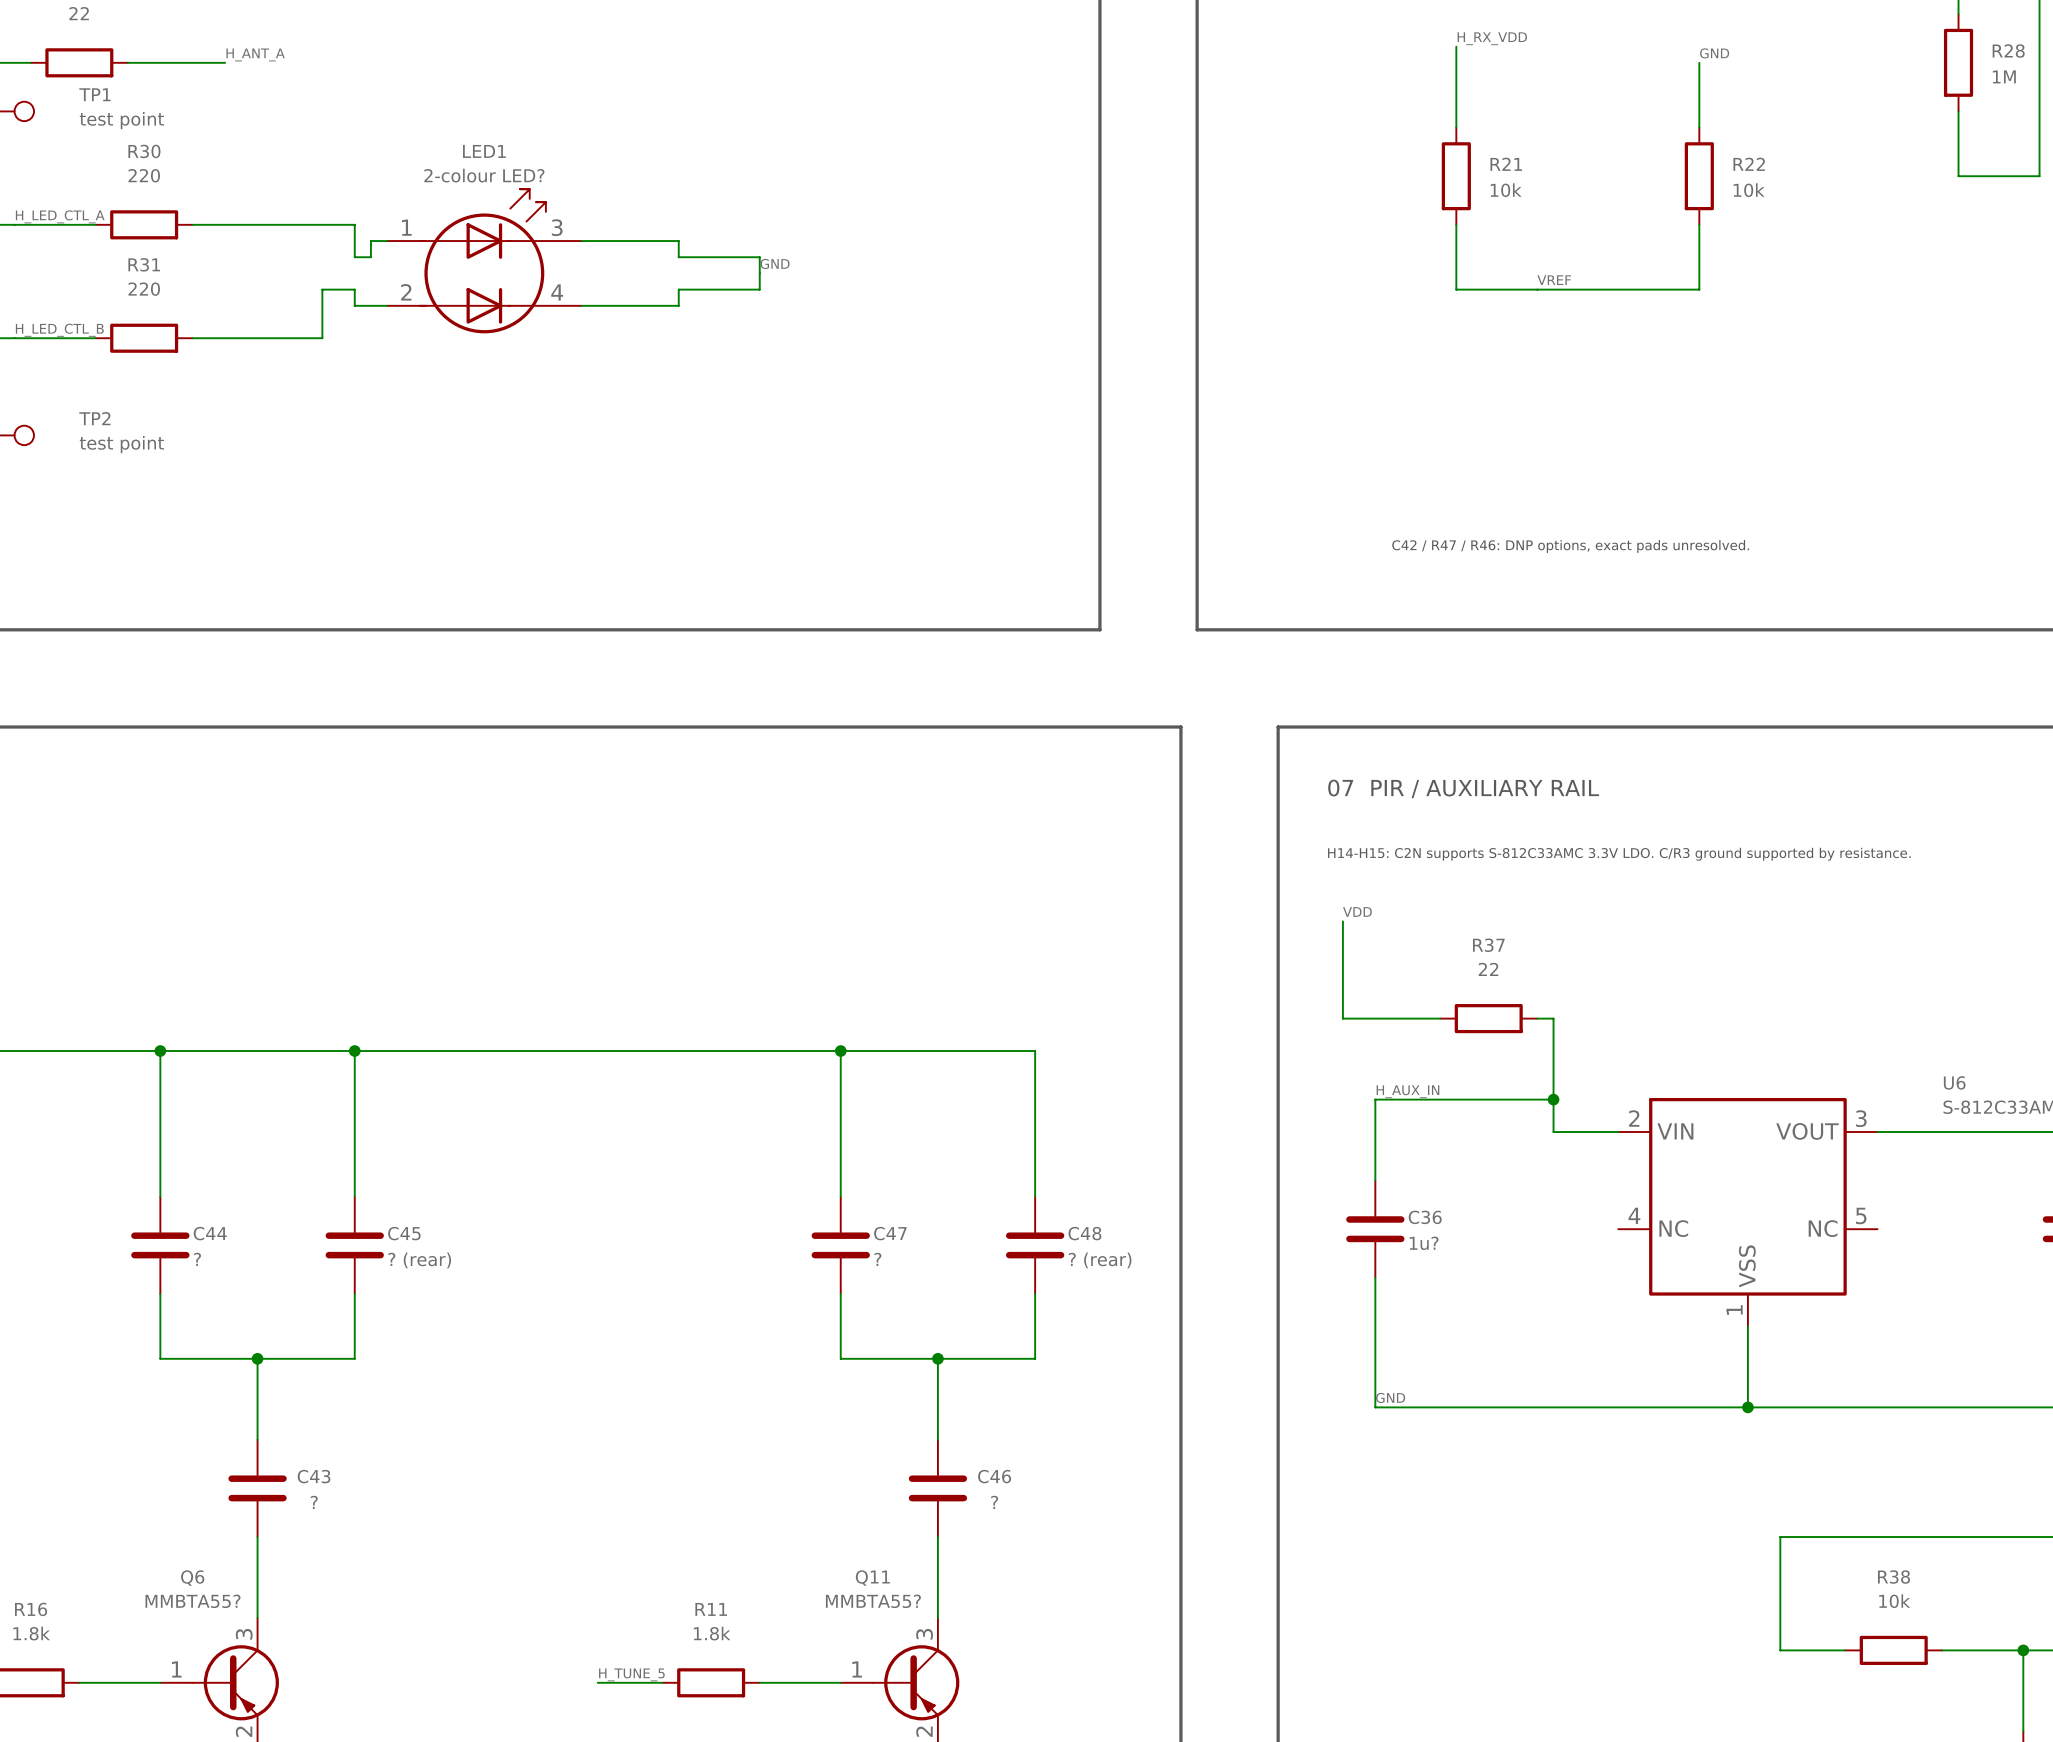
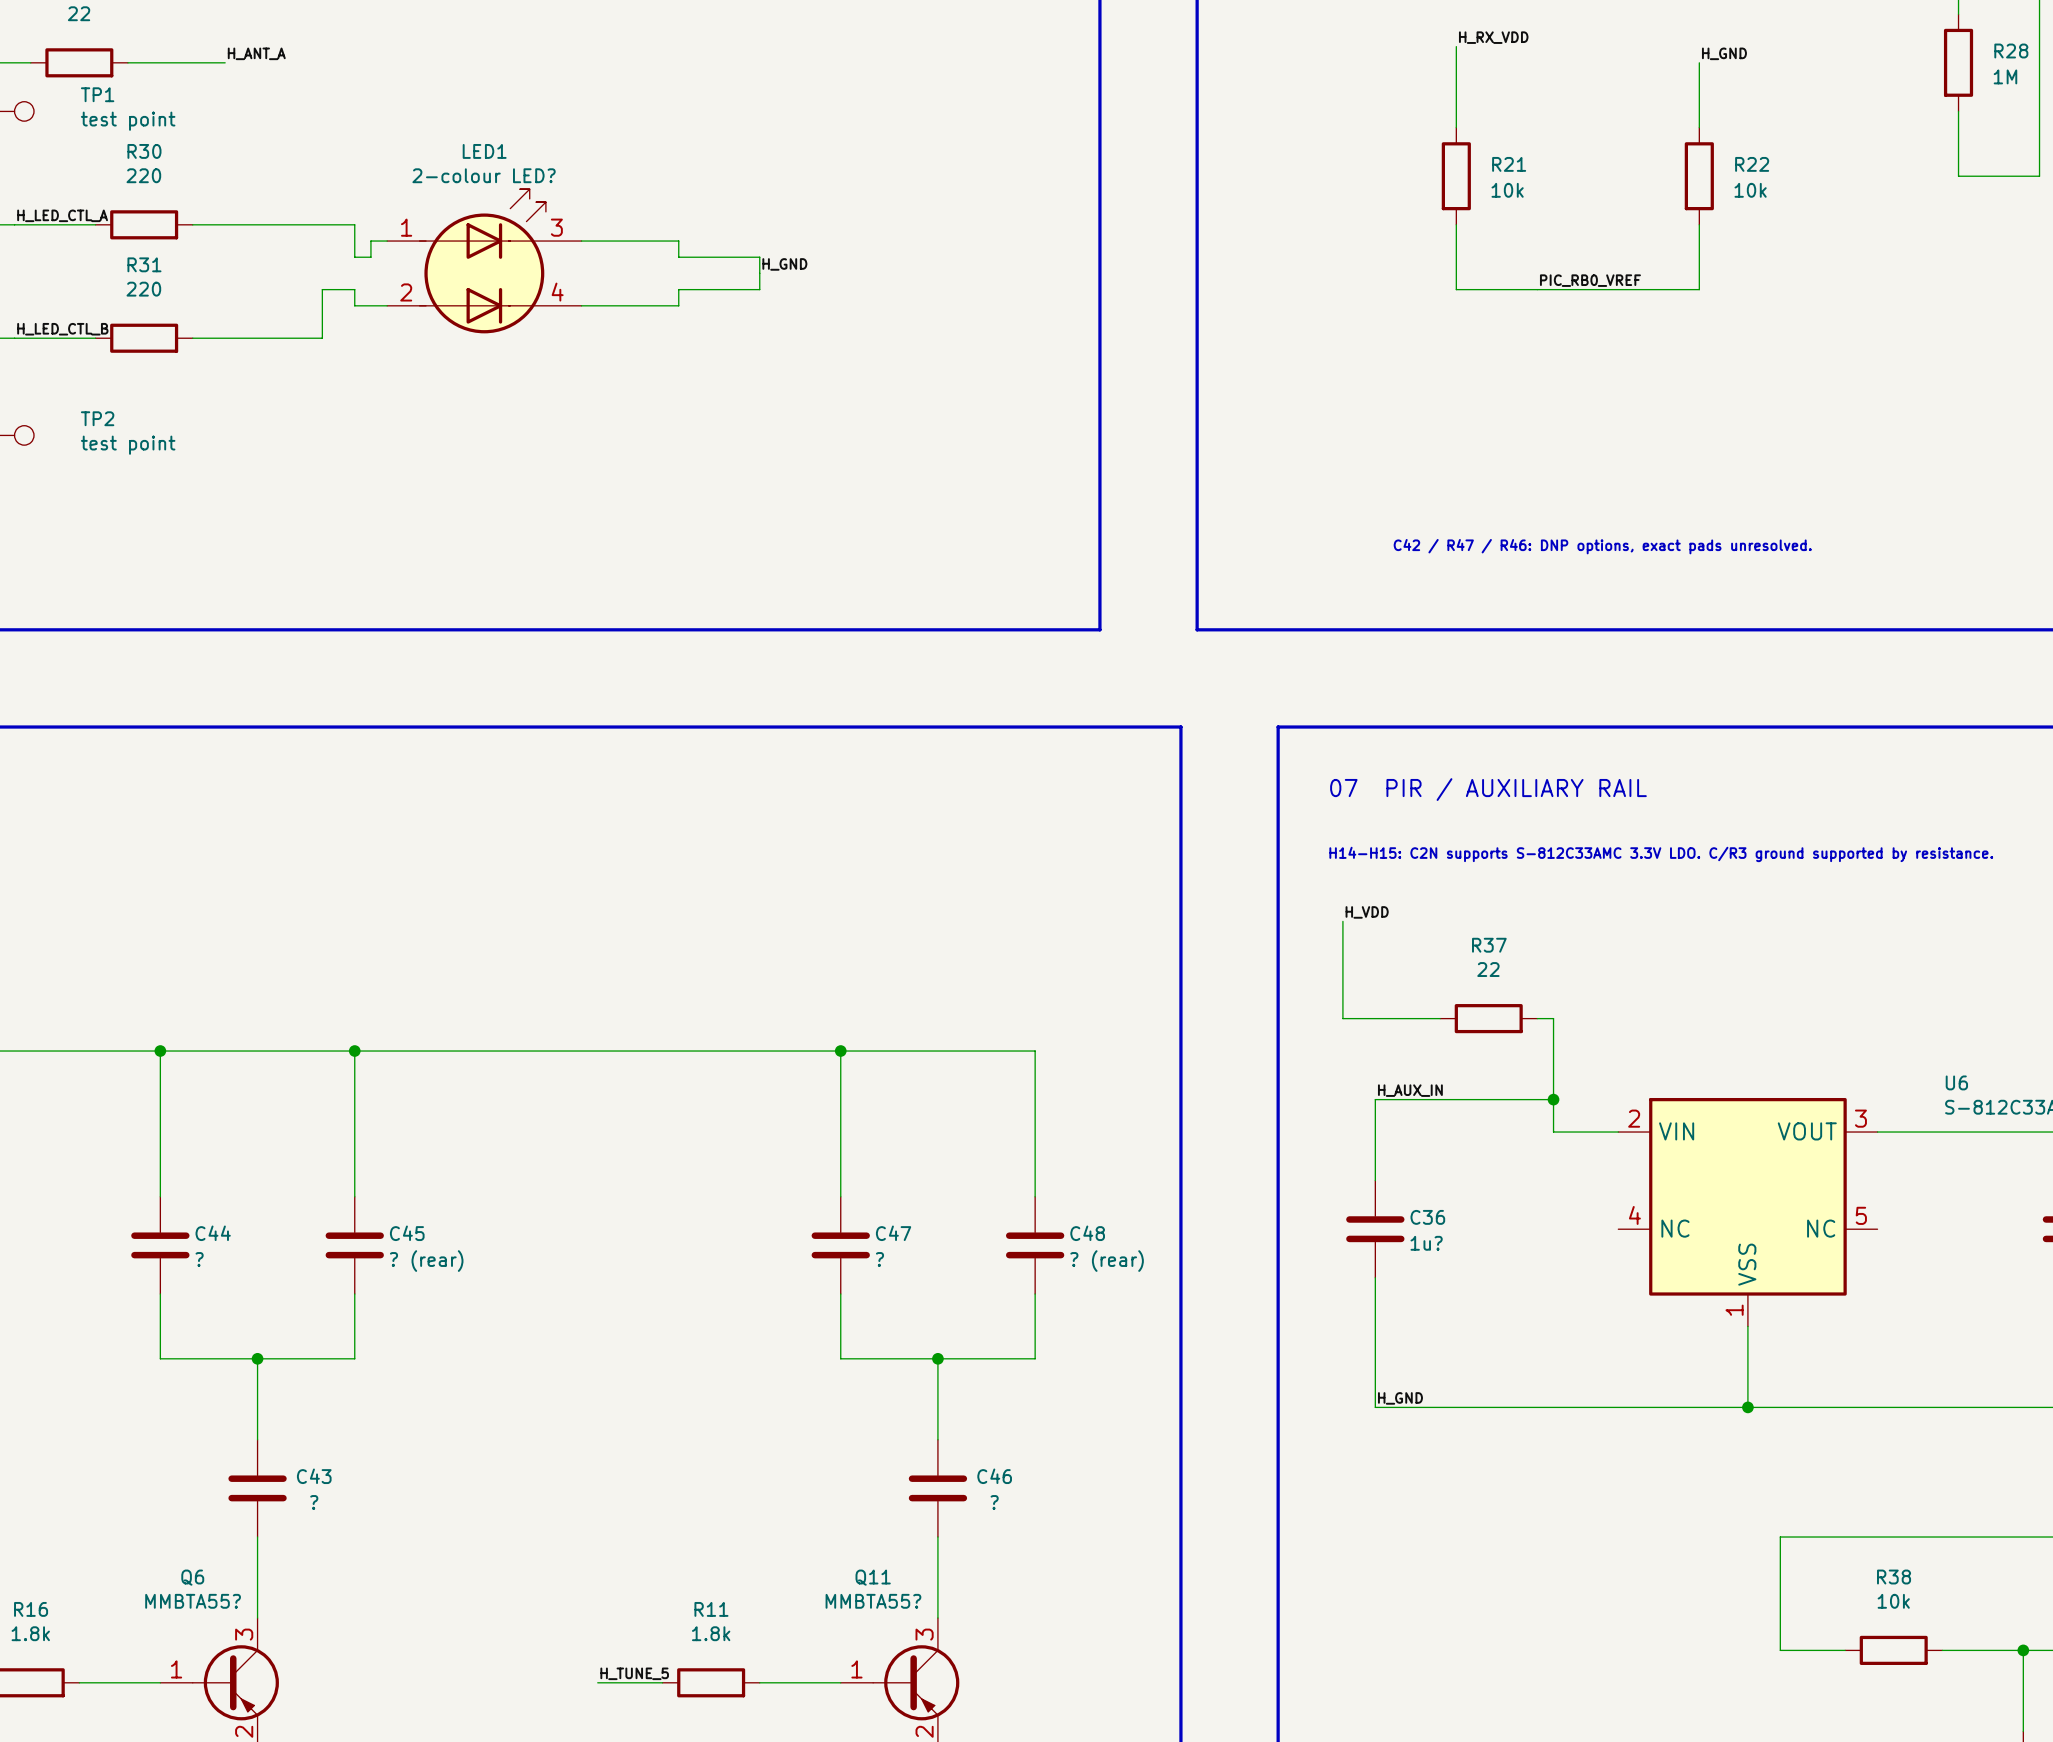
label: GND (1714, 53) -> H_GND (1724, 53)
label: GND (775, 263) -> H_GND (784, 264)
label: VREF (1554, 280) -> PIC_RB0_VREF (1590, 280)
label: VDD (1357, 911) -> H_VDD (1367, 912)
label: GND (1390, 1397) -> H_GND (1400, 1398)

